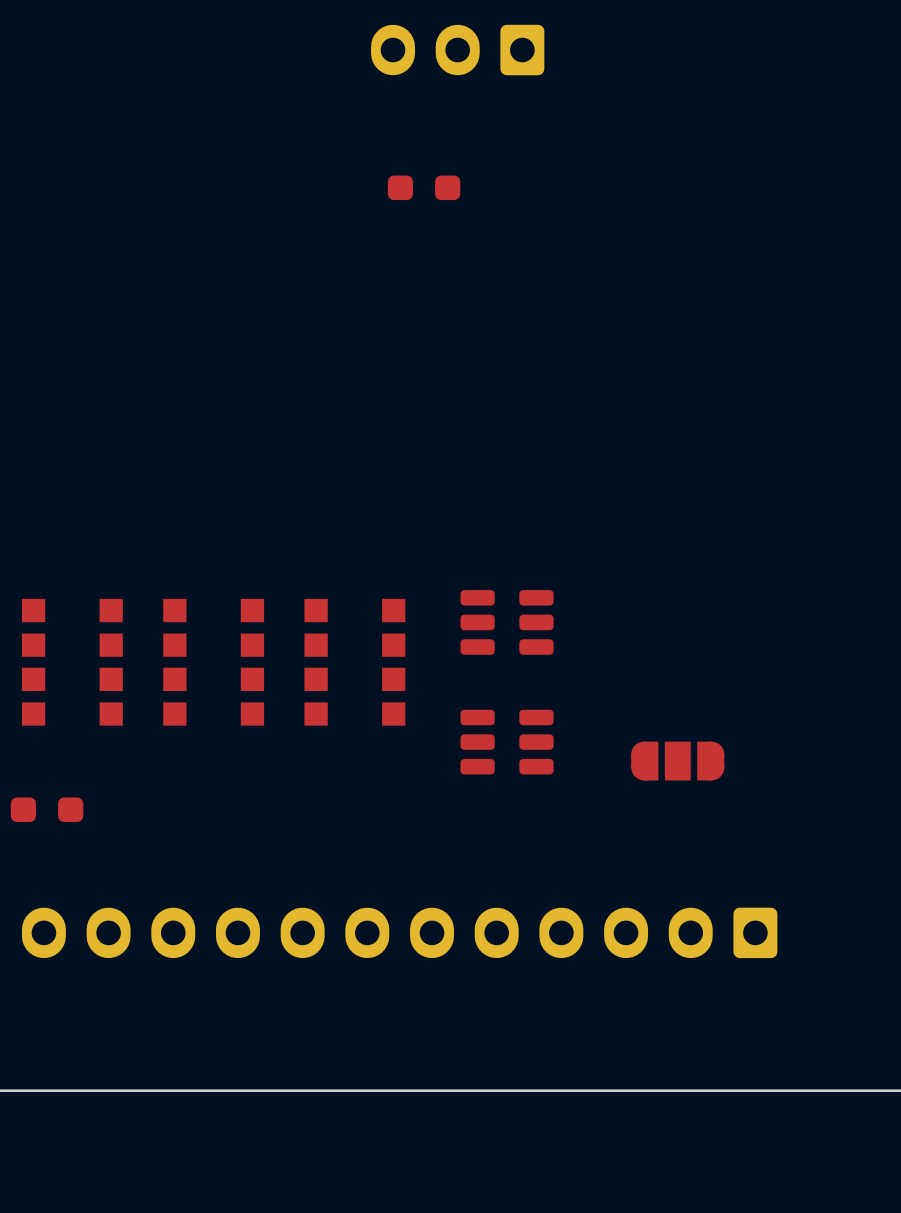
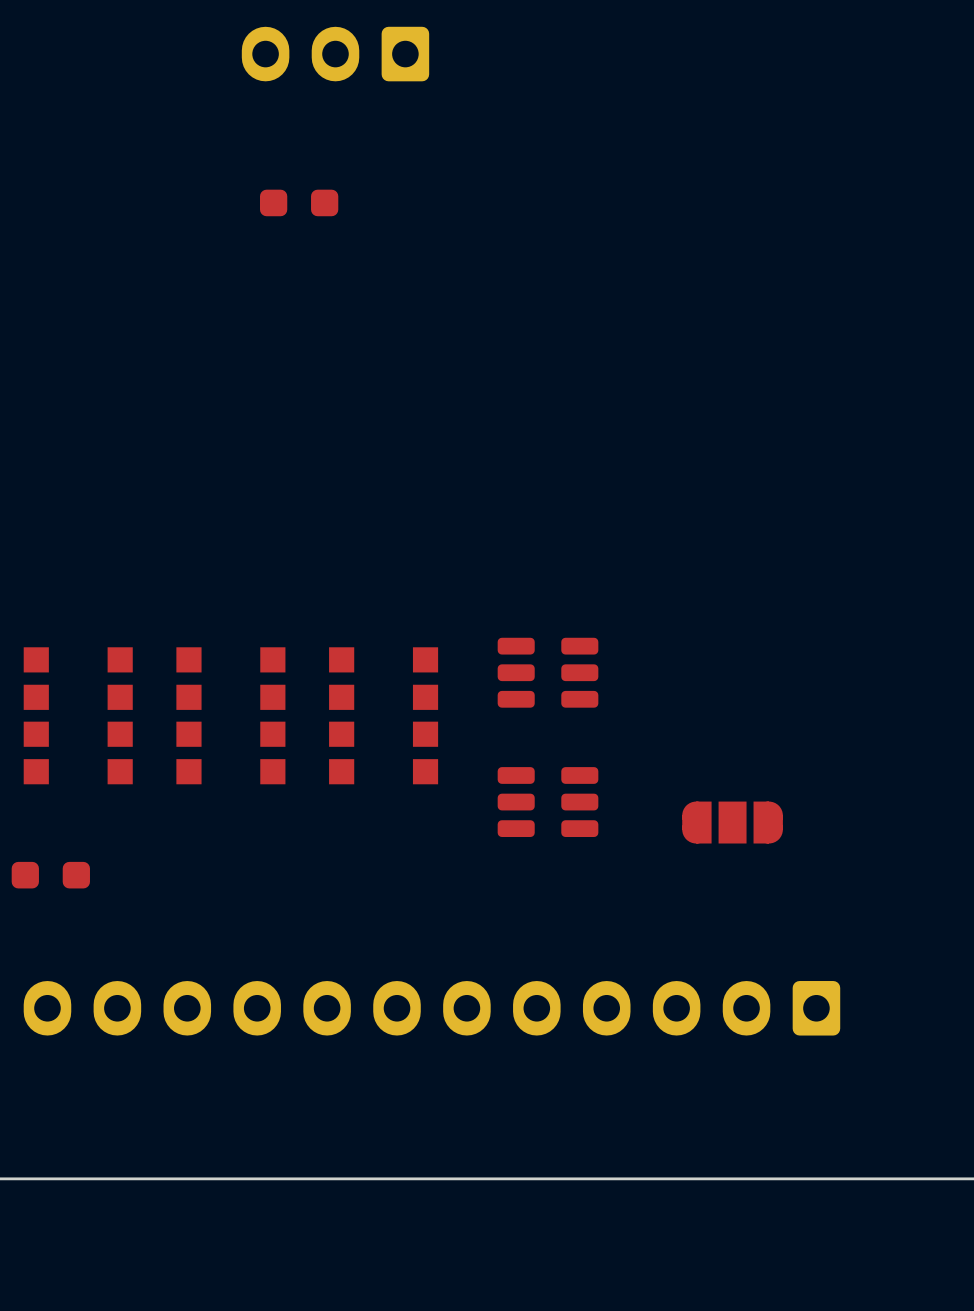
part position: (457, 50) -> (335, 54)
part position: (424, 187) -> (299, 202)

